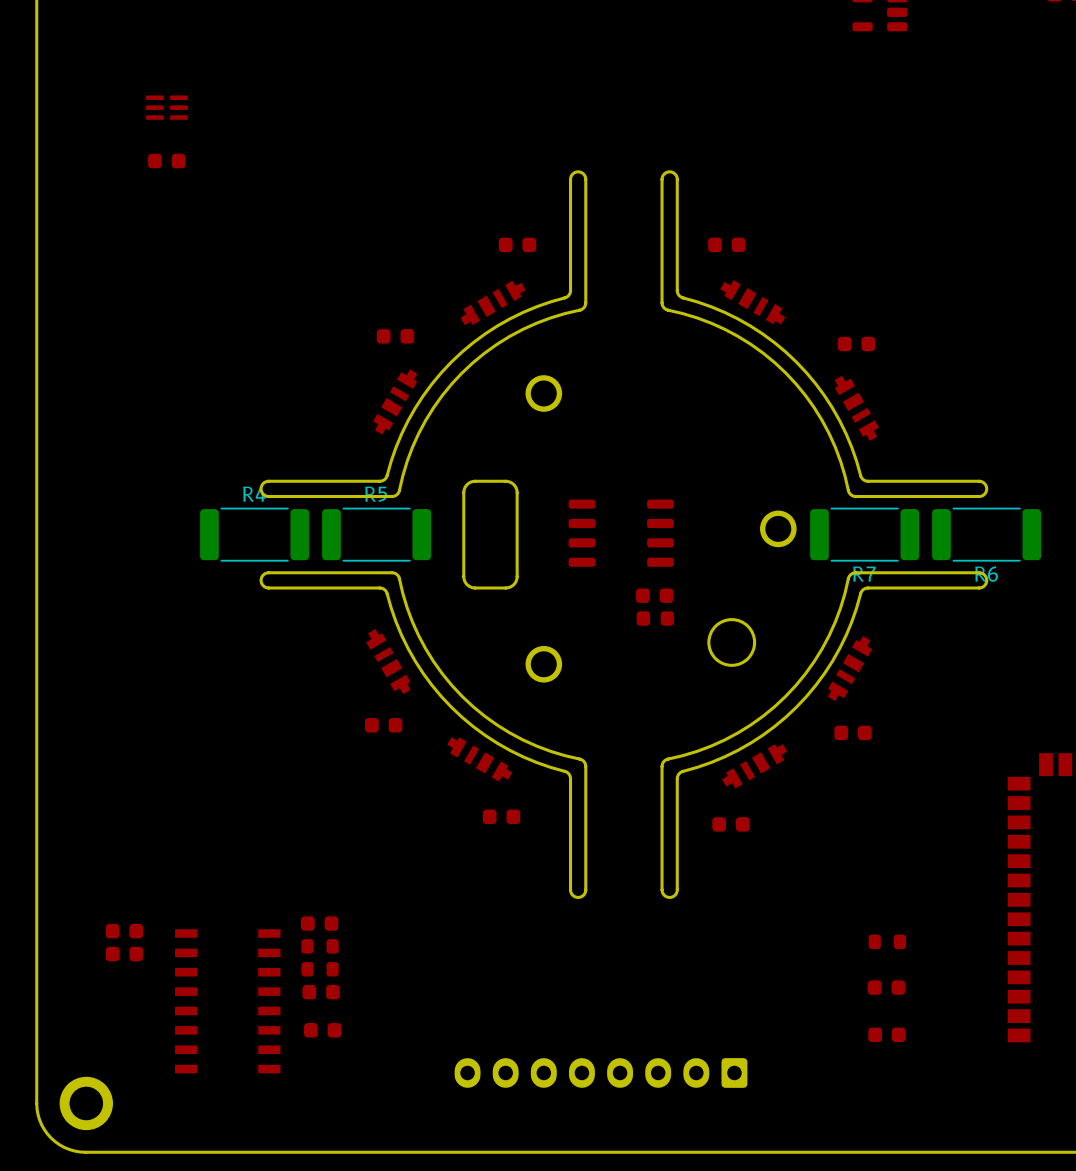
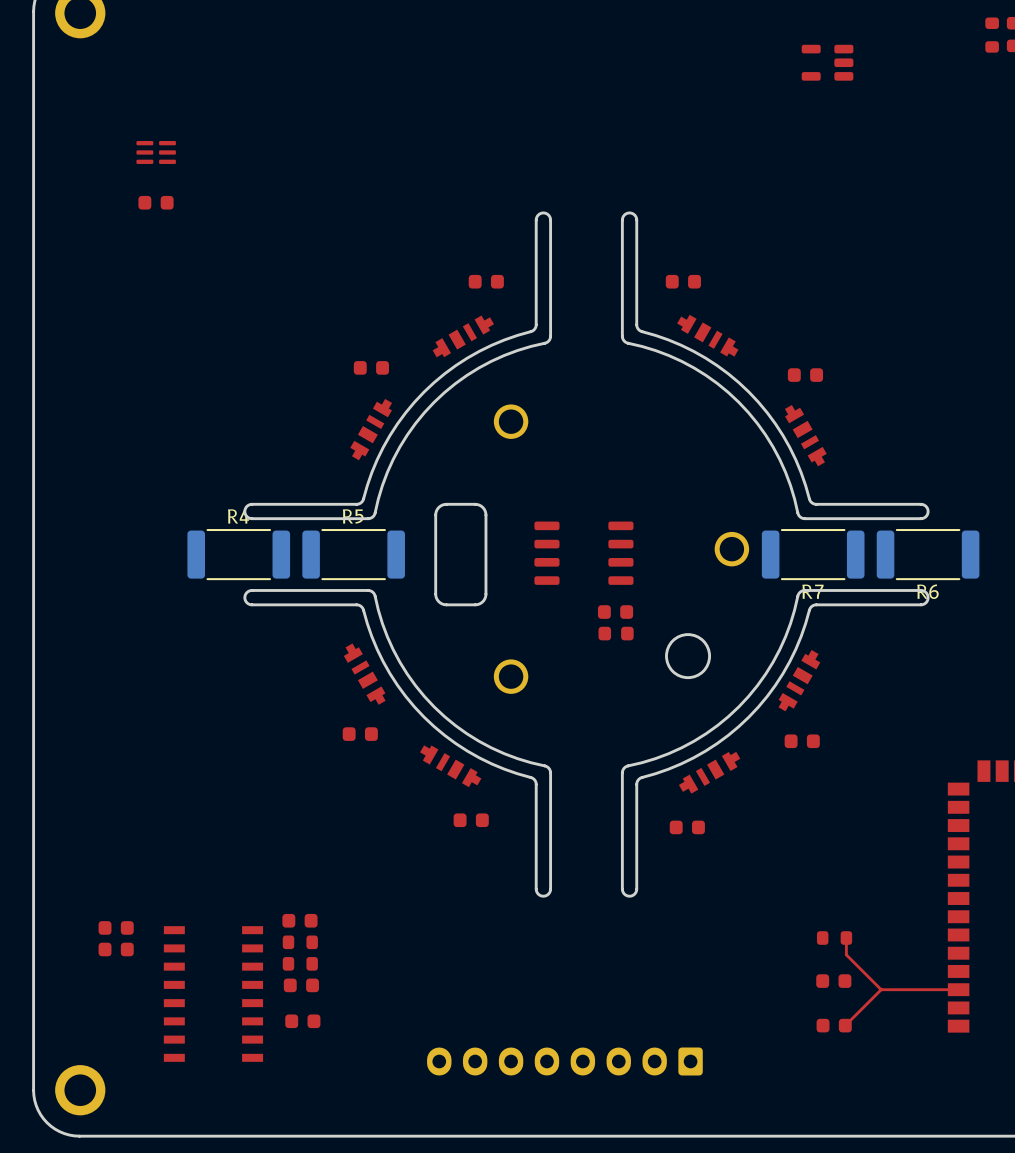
top track: none -> (846, 938) (846, 954) (881, 989)
top track: none -> (881, 989) (845, 1025)
top track: none -> (958, 989) (881, 989)

